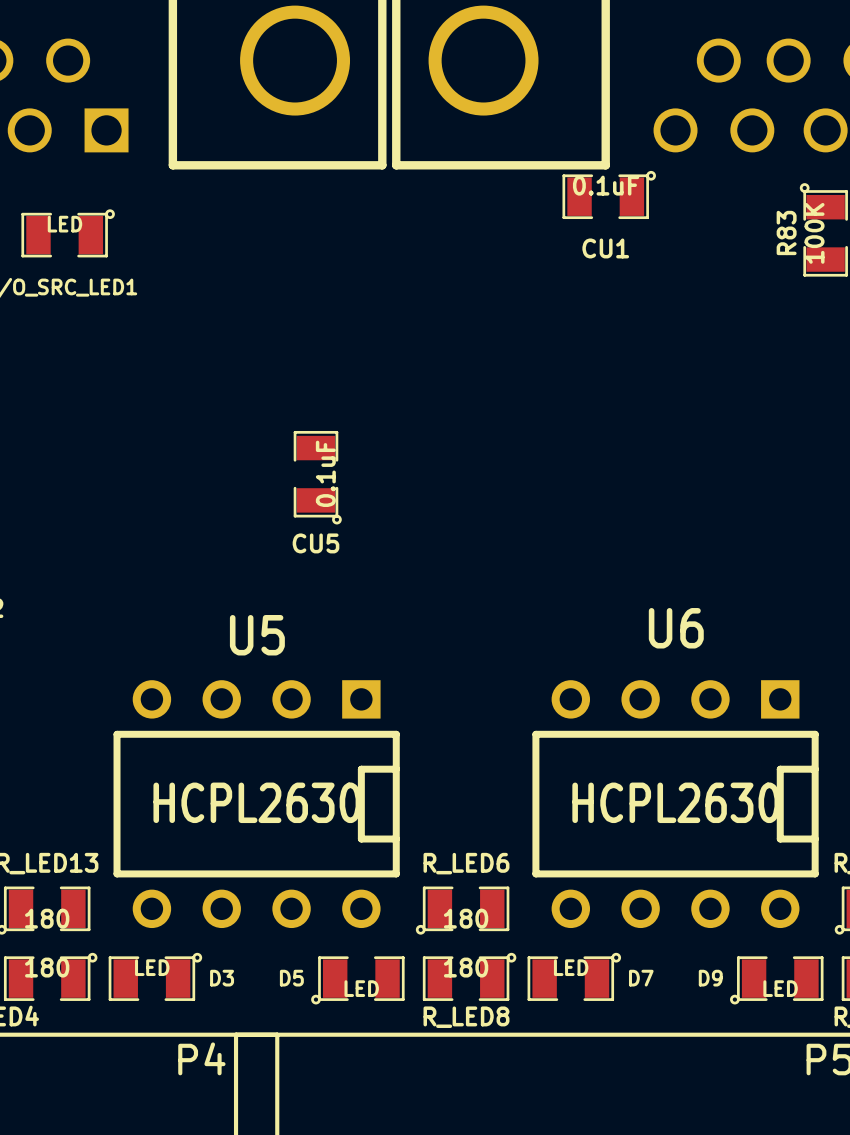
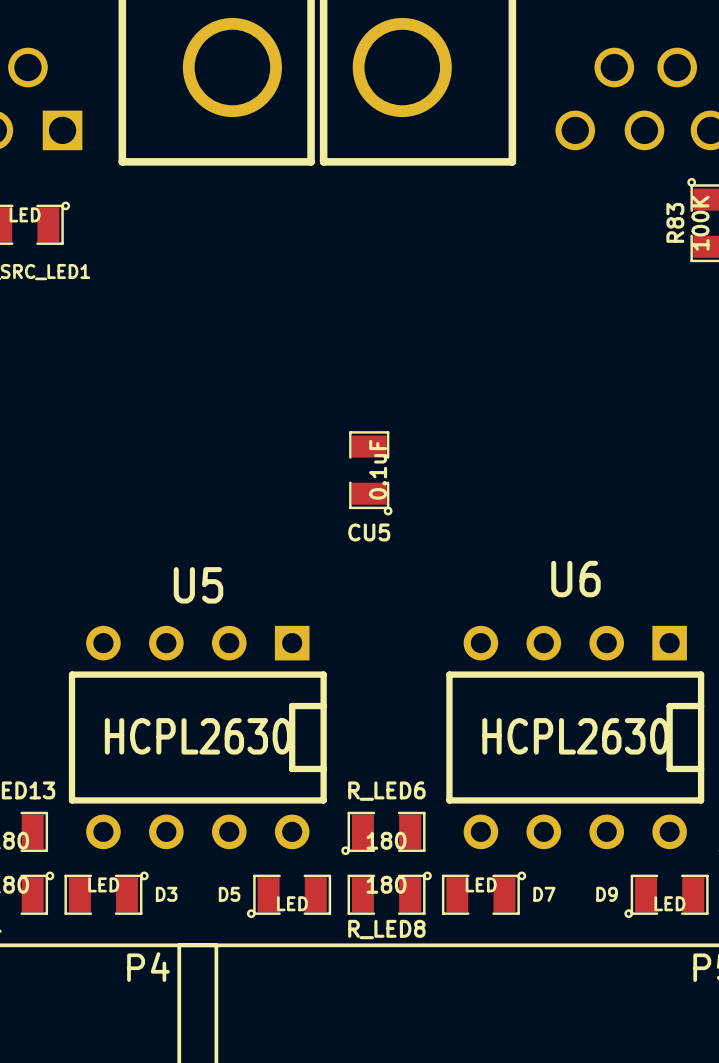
CU1: 0.1uF (609, 194) -> none
CU5 position: (317, 477) -> (370, 473)

